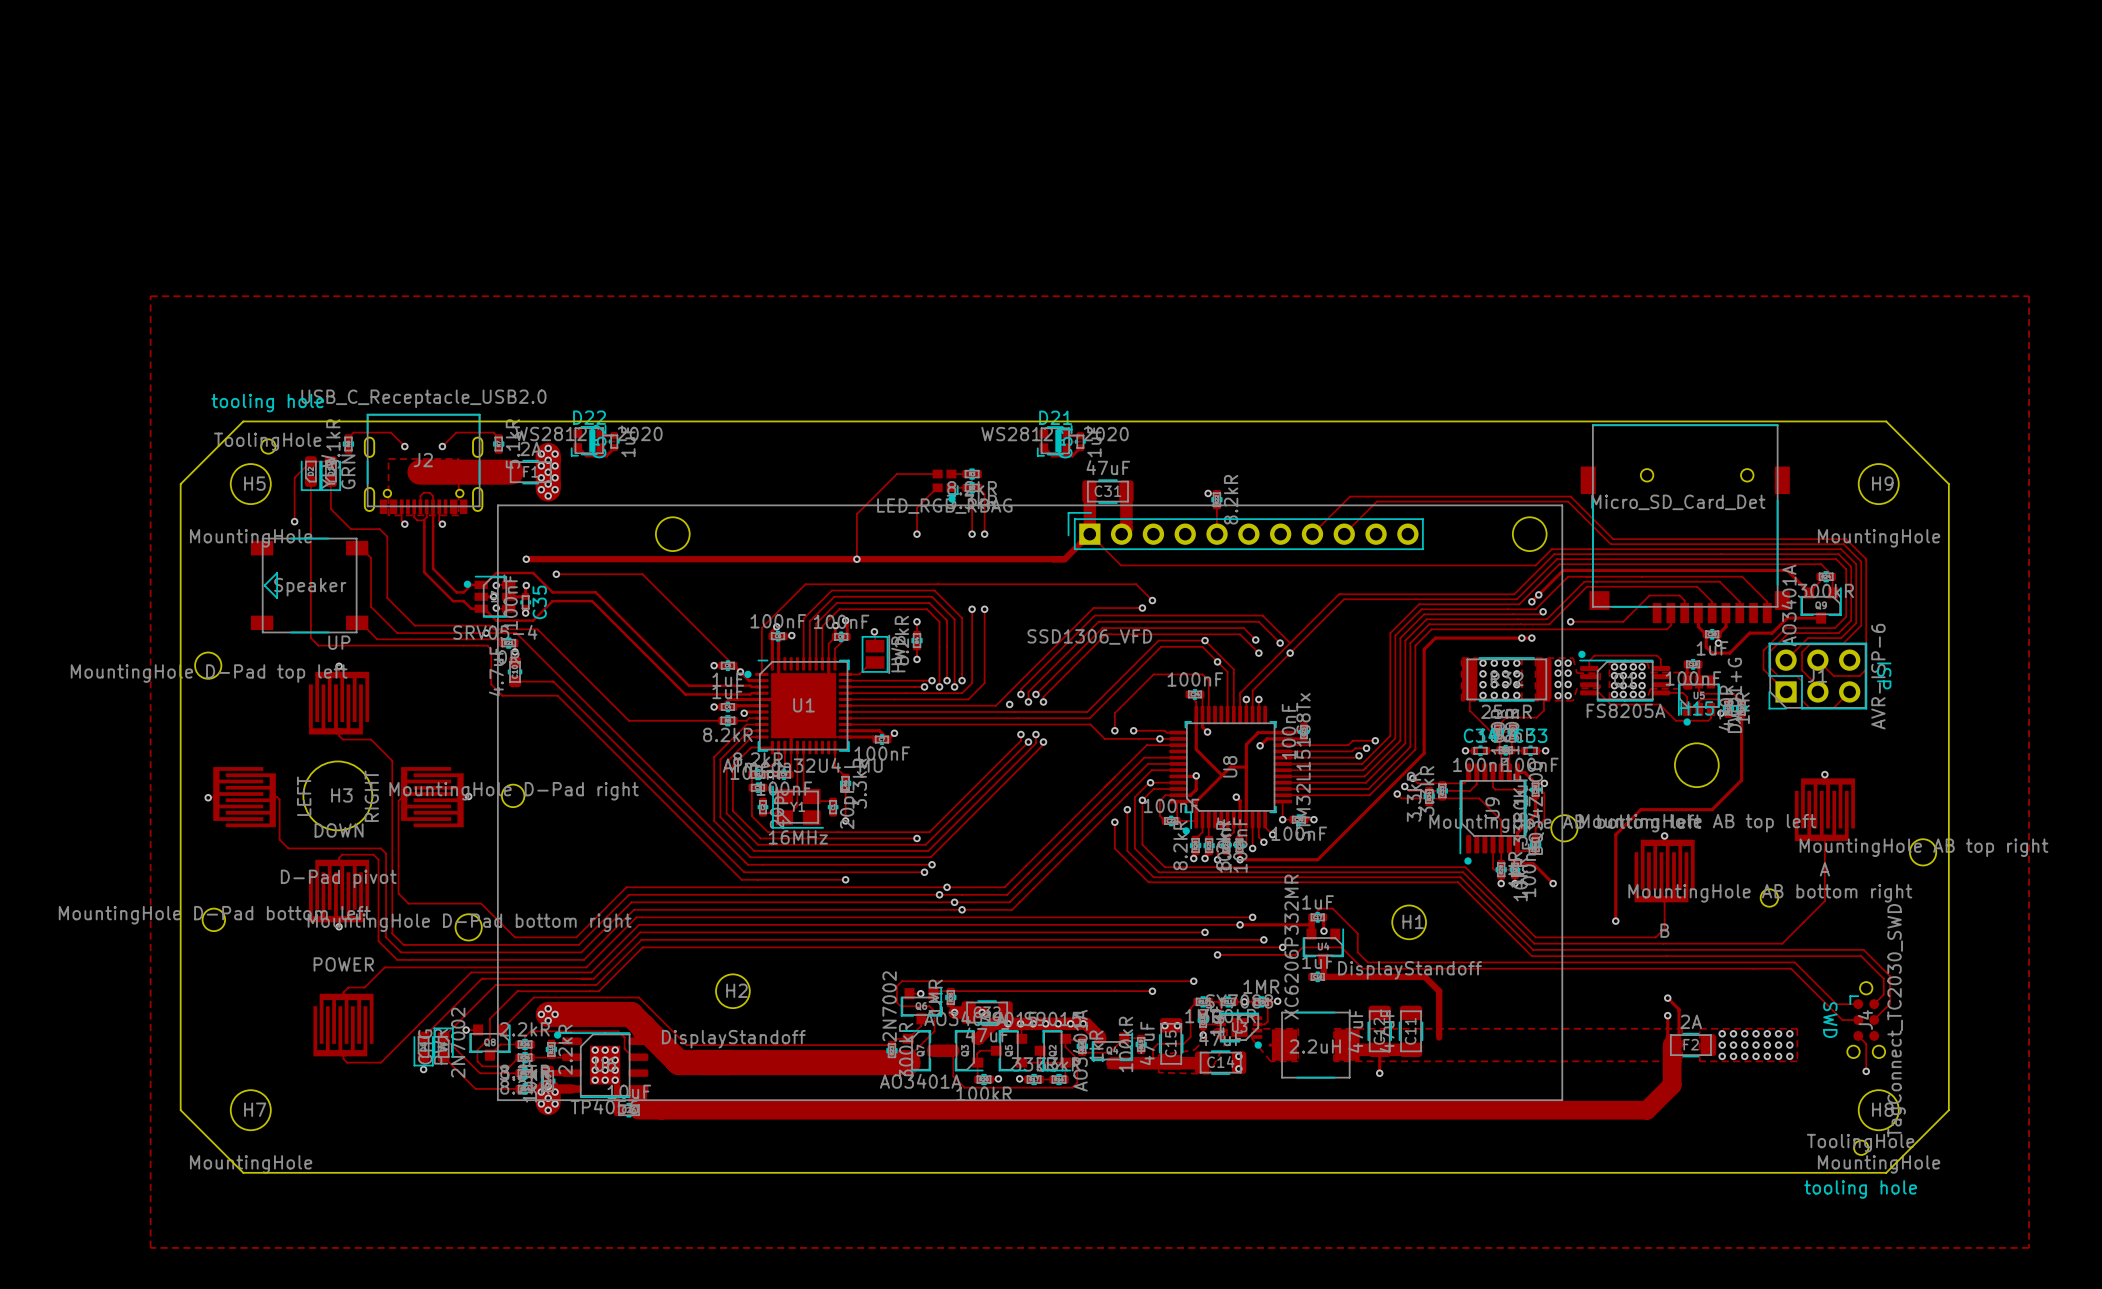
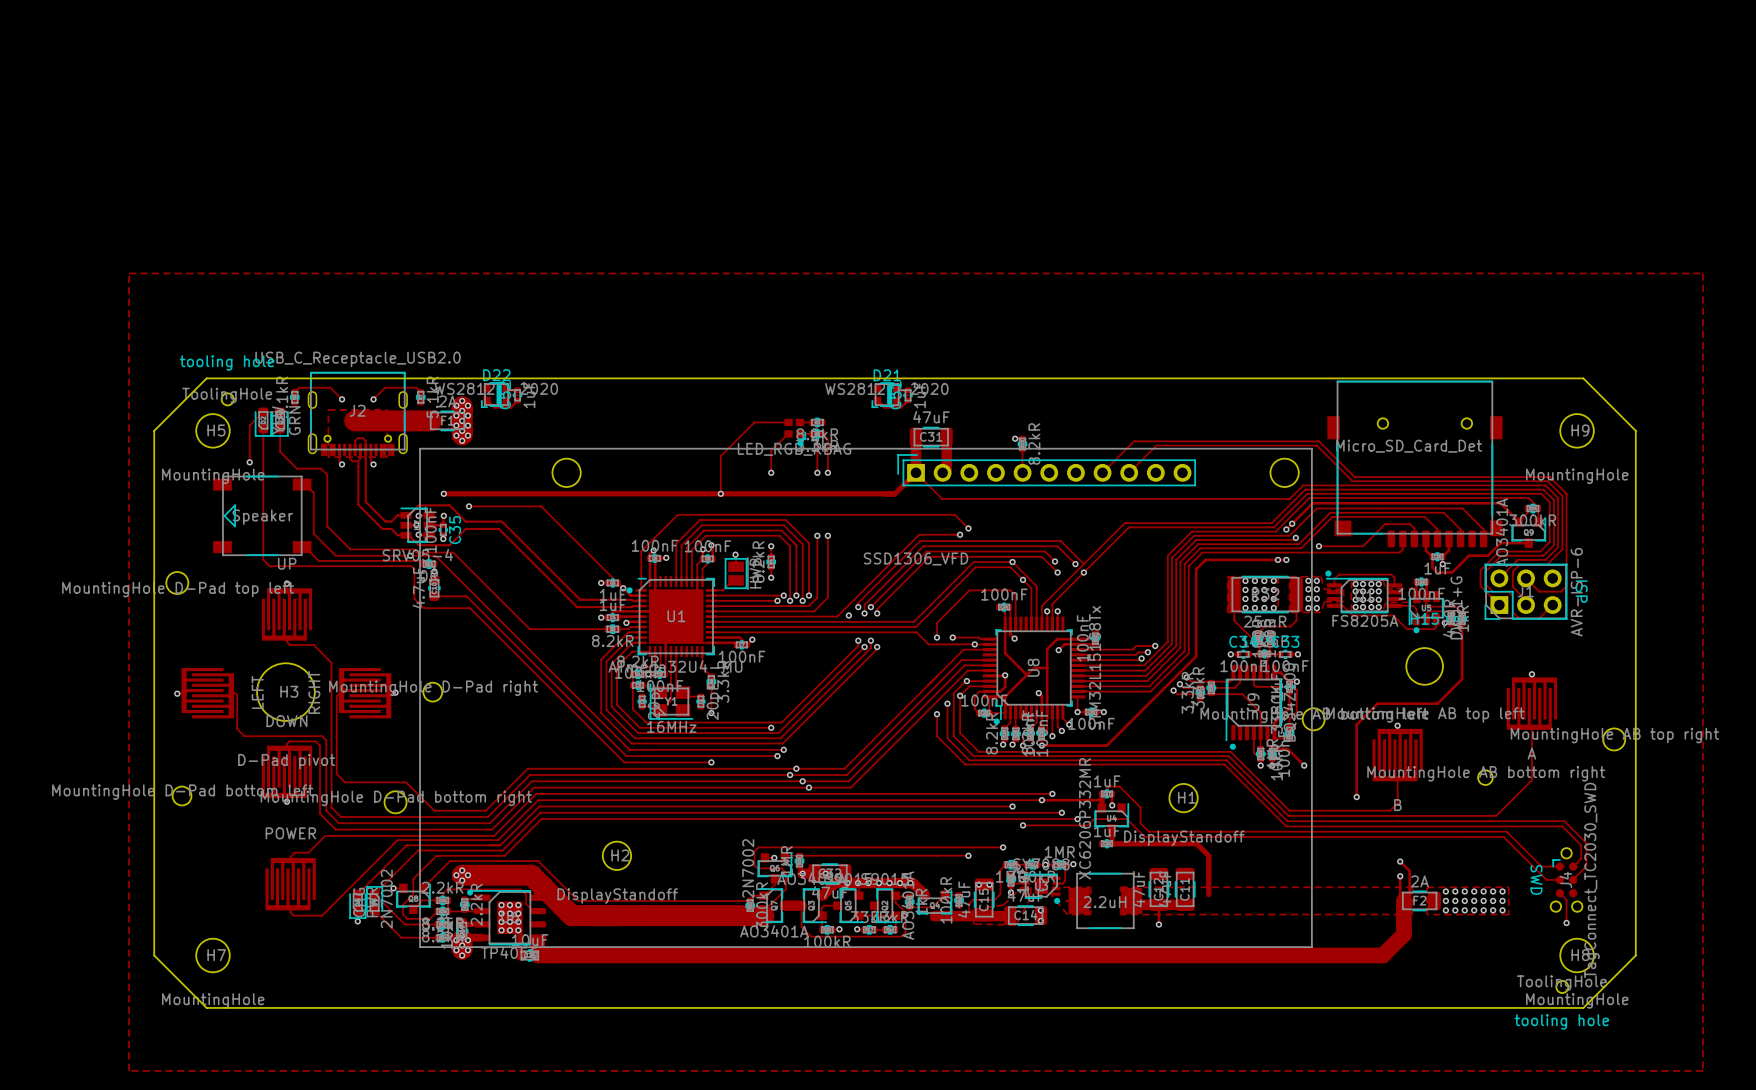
drawing: [463, 580, 472, 588] -> none

